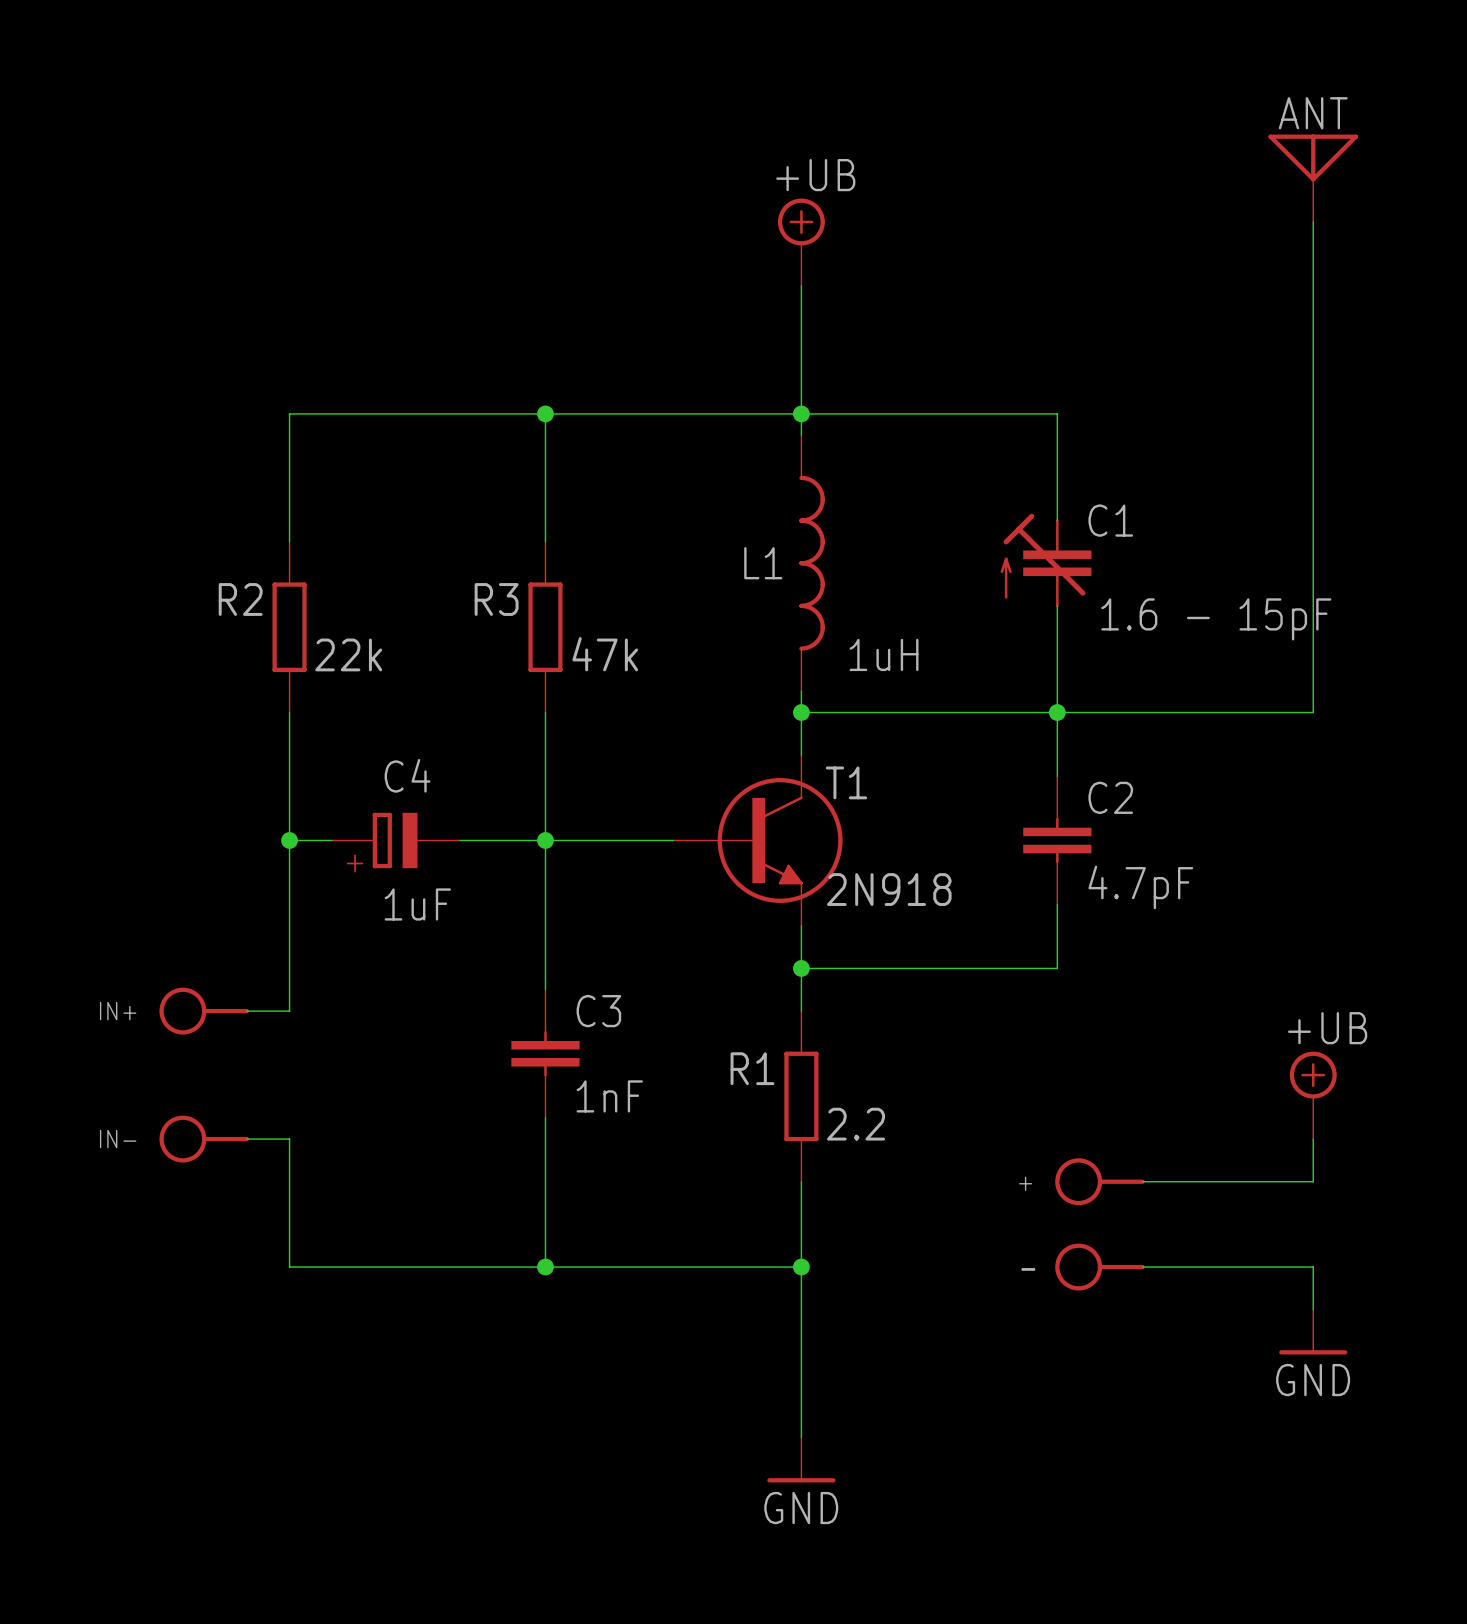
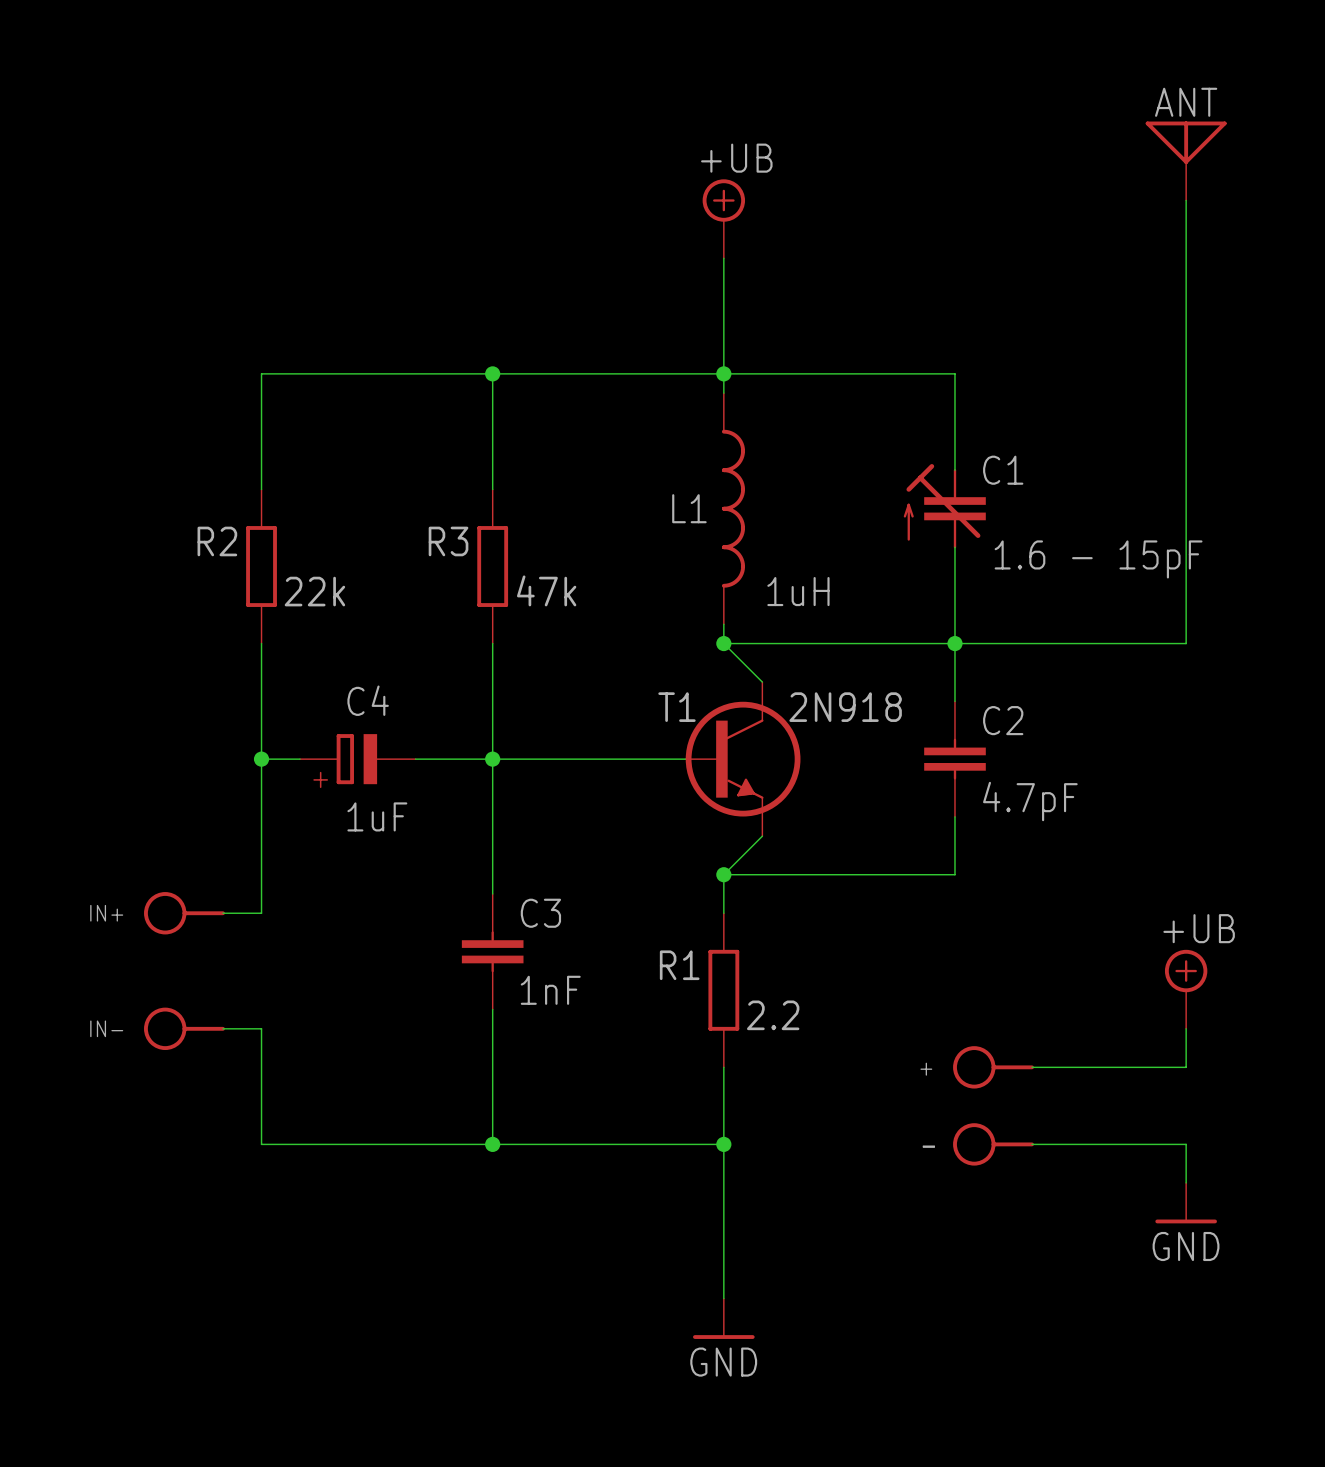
wire: (801, 712) (801, 755) -> (723, 643) (762, 682)
T1 symbol: [673, 755, 843, 926] -> [685, 682, 801, 837]
T1 name position: T1 (846, 782) -> T1 (676, 707)
T1 value position: 2N918 (889, 889) -> 2N918 (845, 707)
wire: (801, 925) (801, 968) -> (762, 836) (723, 874)

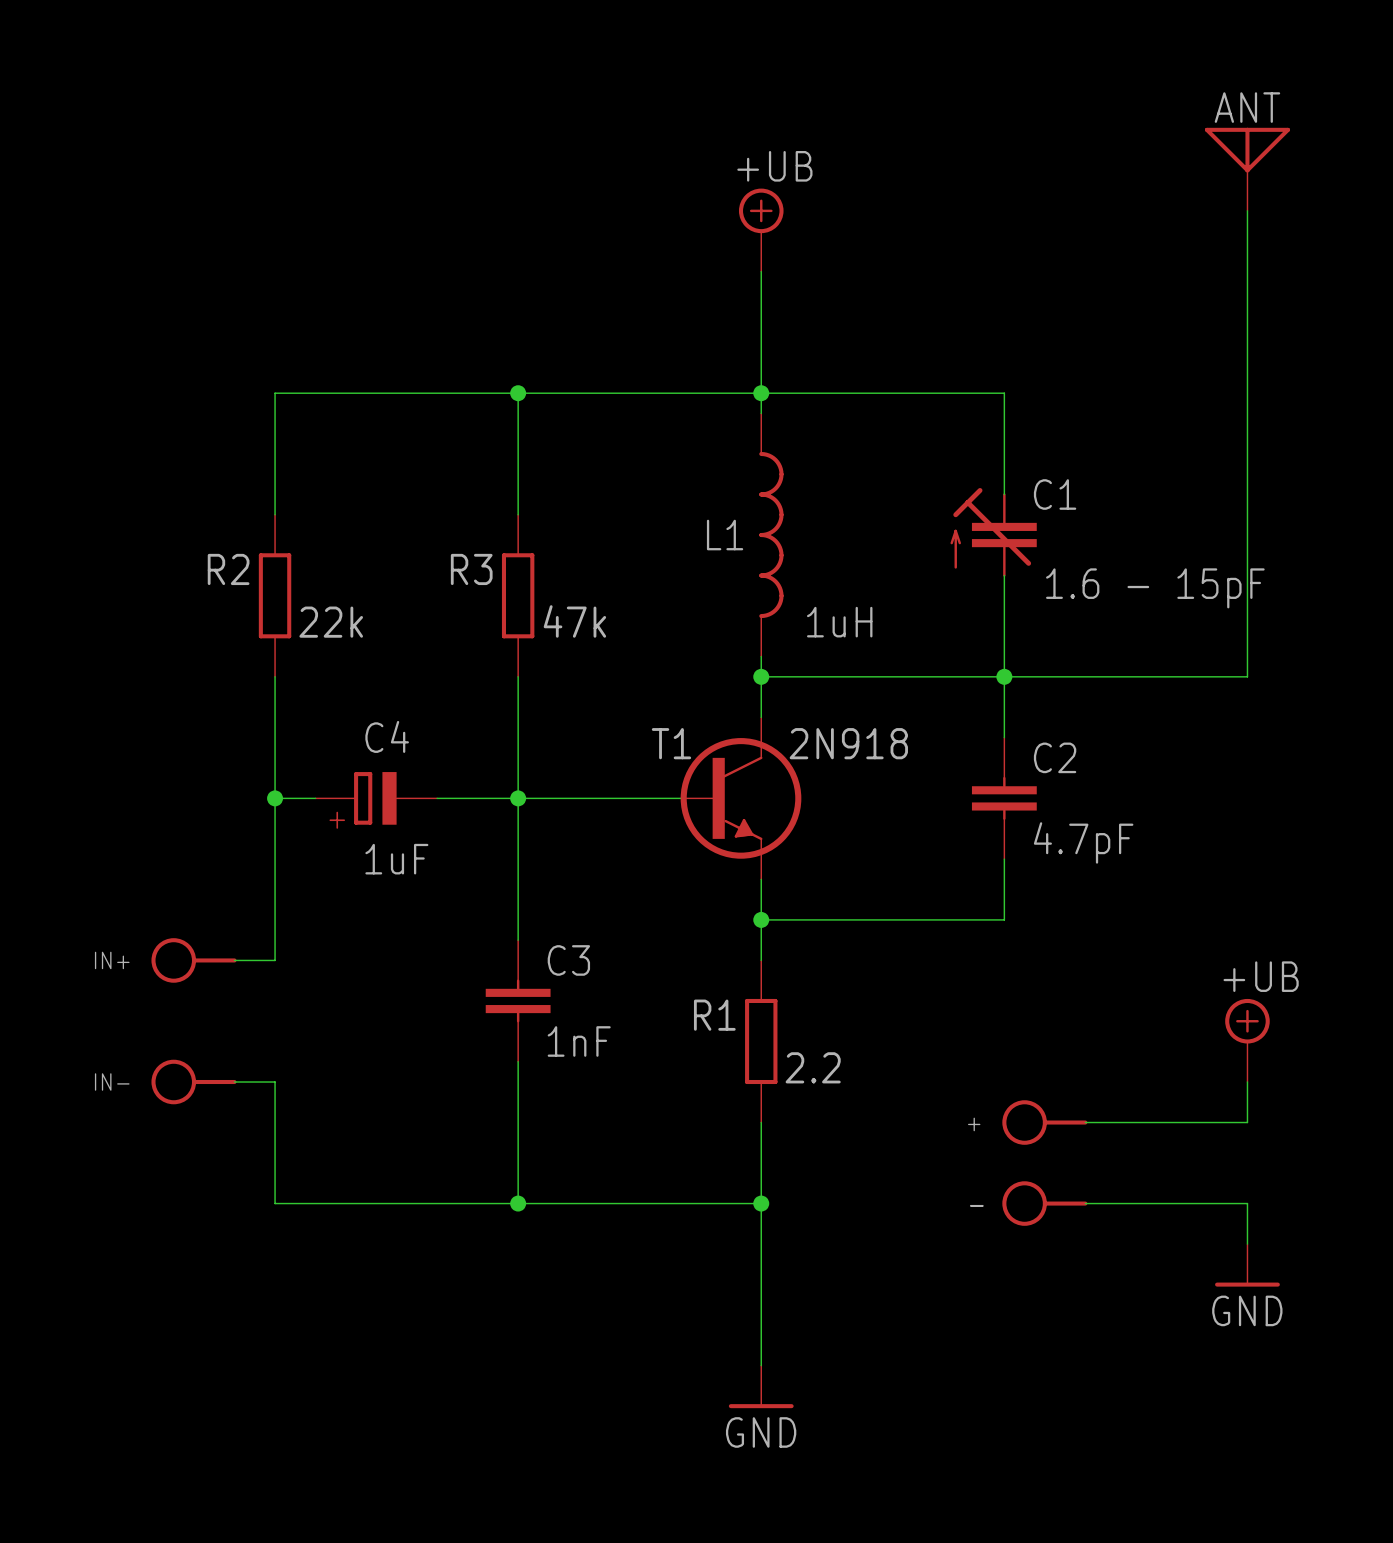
wire: (723, 643) (762, 682) -> (761, 676) (761, 717)
T1 position: (742, 759) -> (740, 798)
wire: (762, 836) (723, 874) -> (761, 879) (761, 919)

